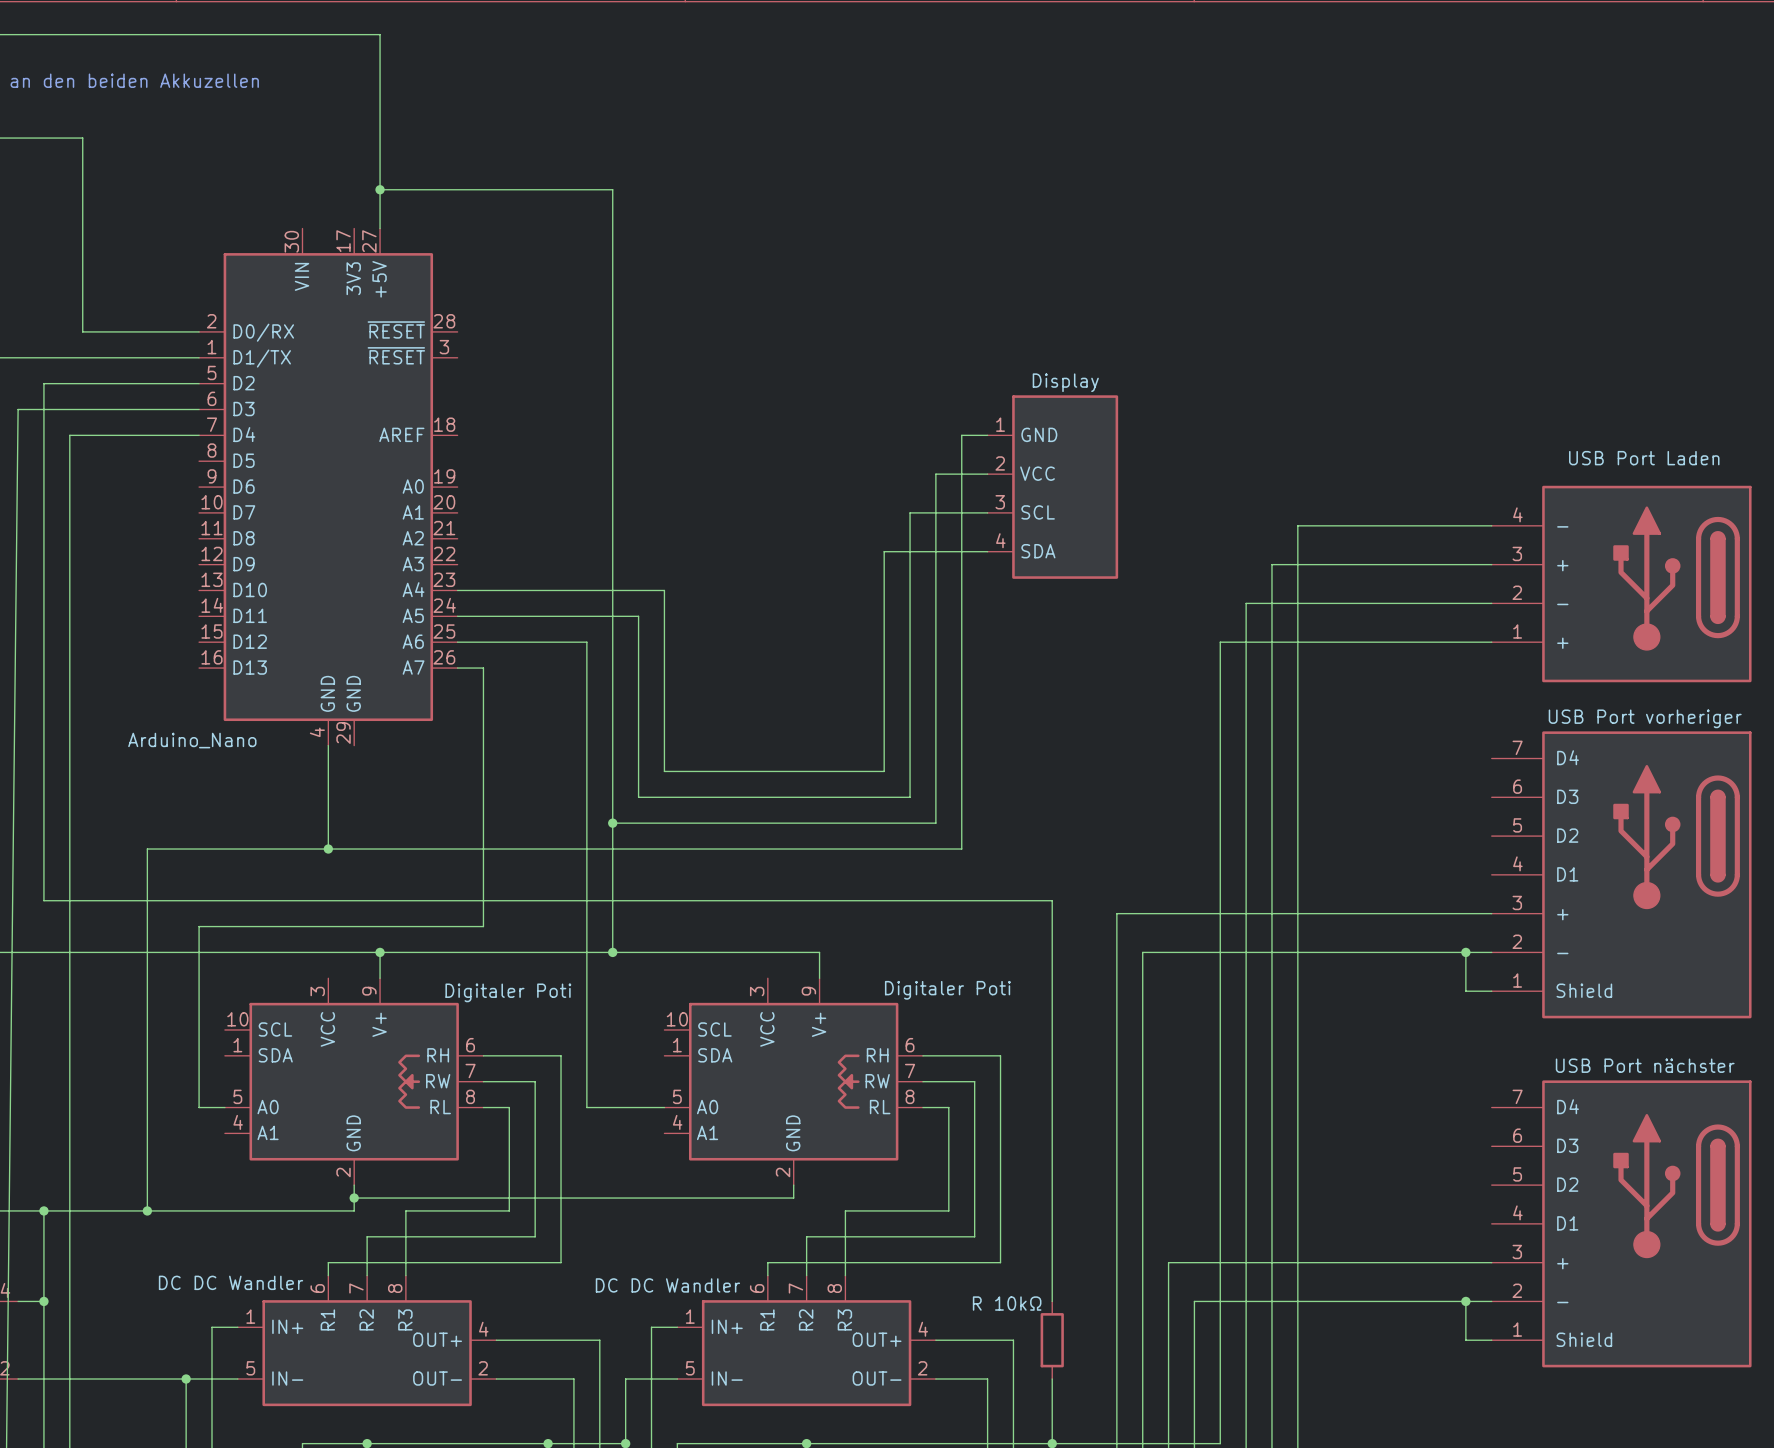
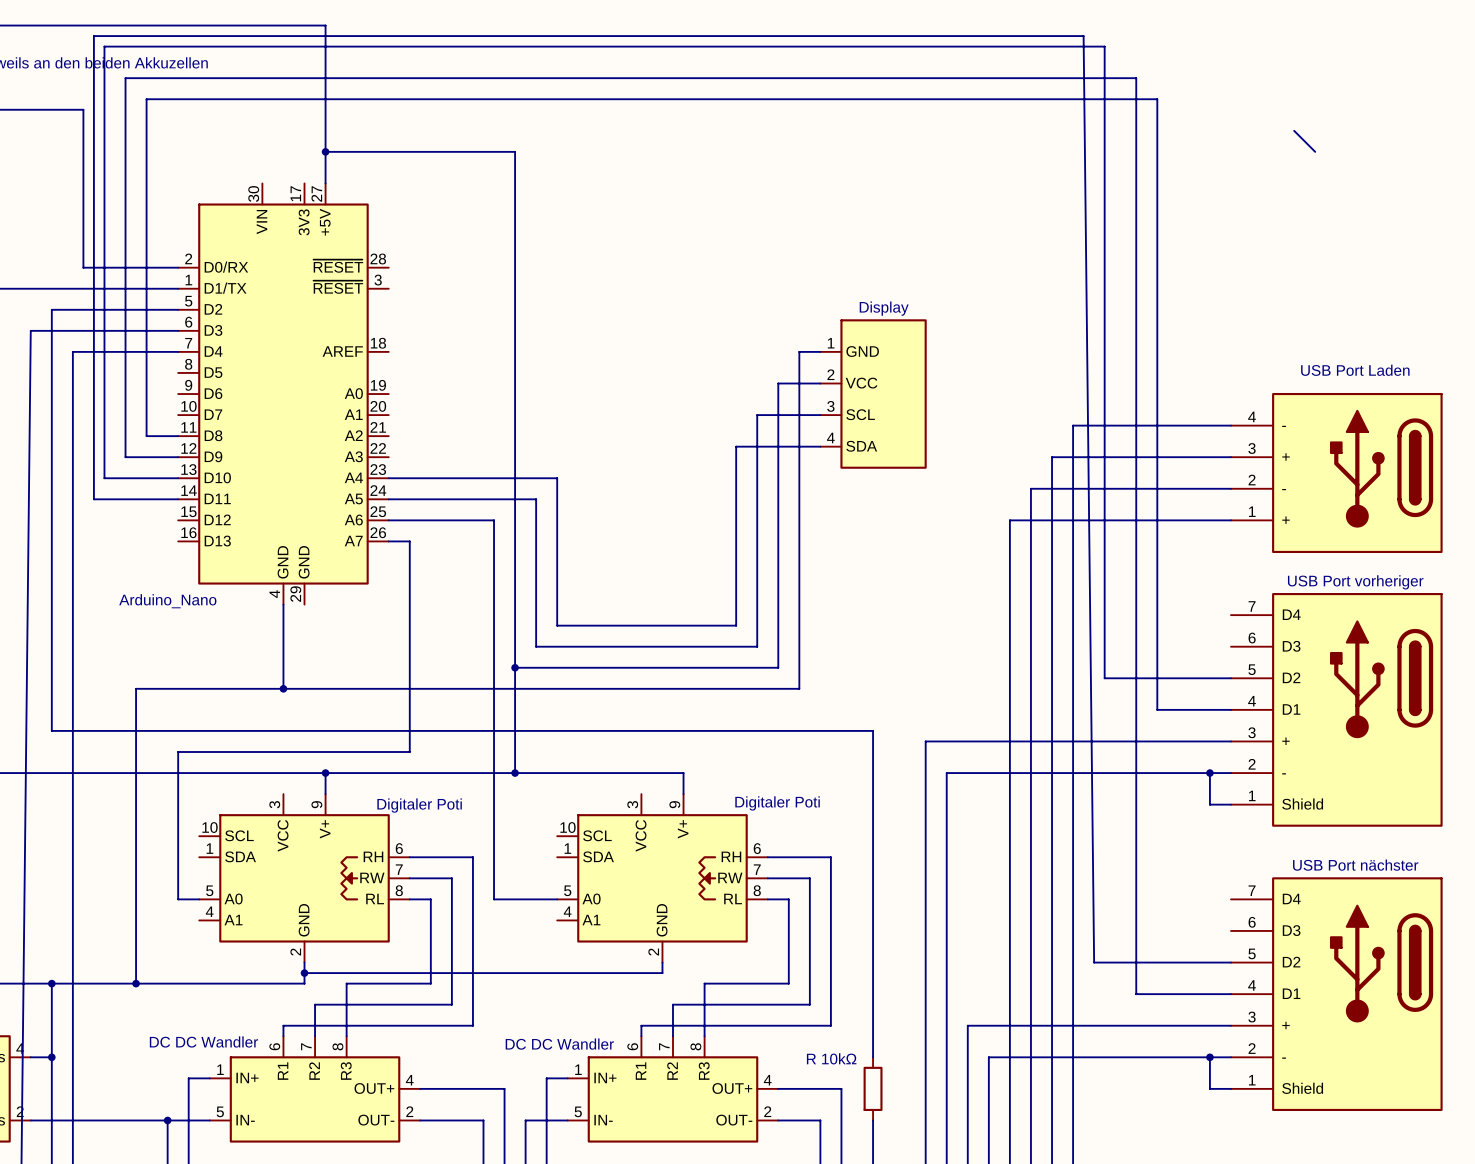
wire: none -> (1294, 130) (1315, 151)
wire: none -> (178, 436) (146, 436) (146, 99) (1157, 99) (1157, 709) (1231, 709)
wire: none -> (178, 457) (125, 457) (125, 78) (1136, 78) (1136, 994) (1231, 994)
wire: none -> (178, 478) (104, 478) (104, 46) (1104, 46) (1104, 678) (1231, 678)
wire: none -> (178, 499) (93, 499) (93, 36) (1083, 36) (1094, 962) (1231, 962)

